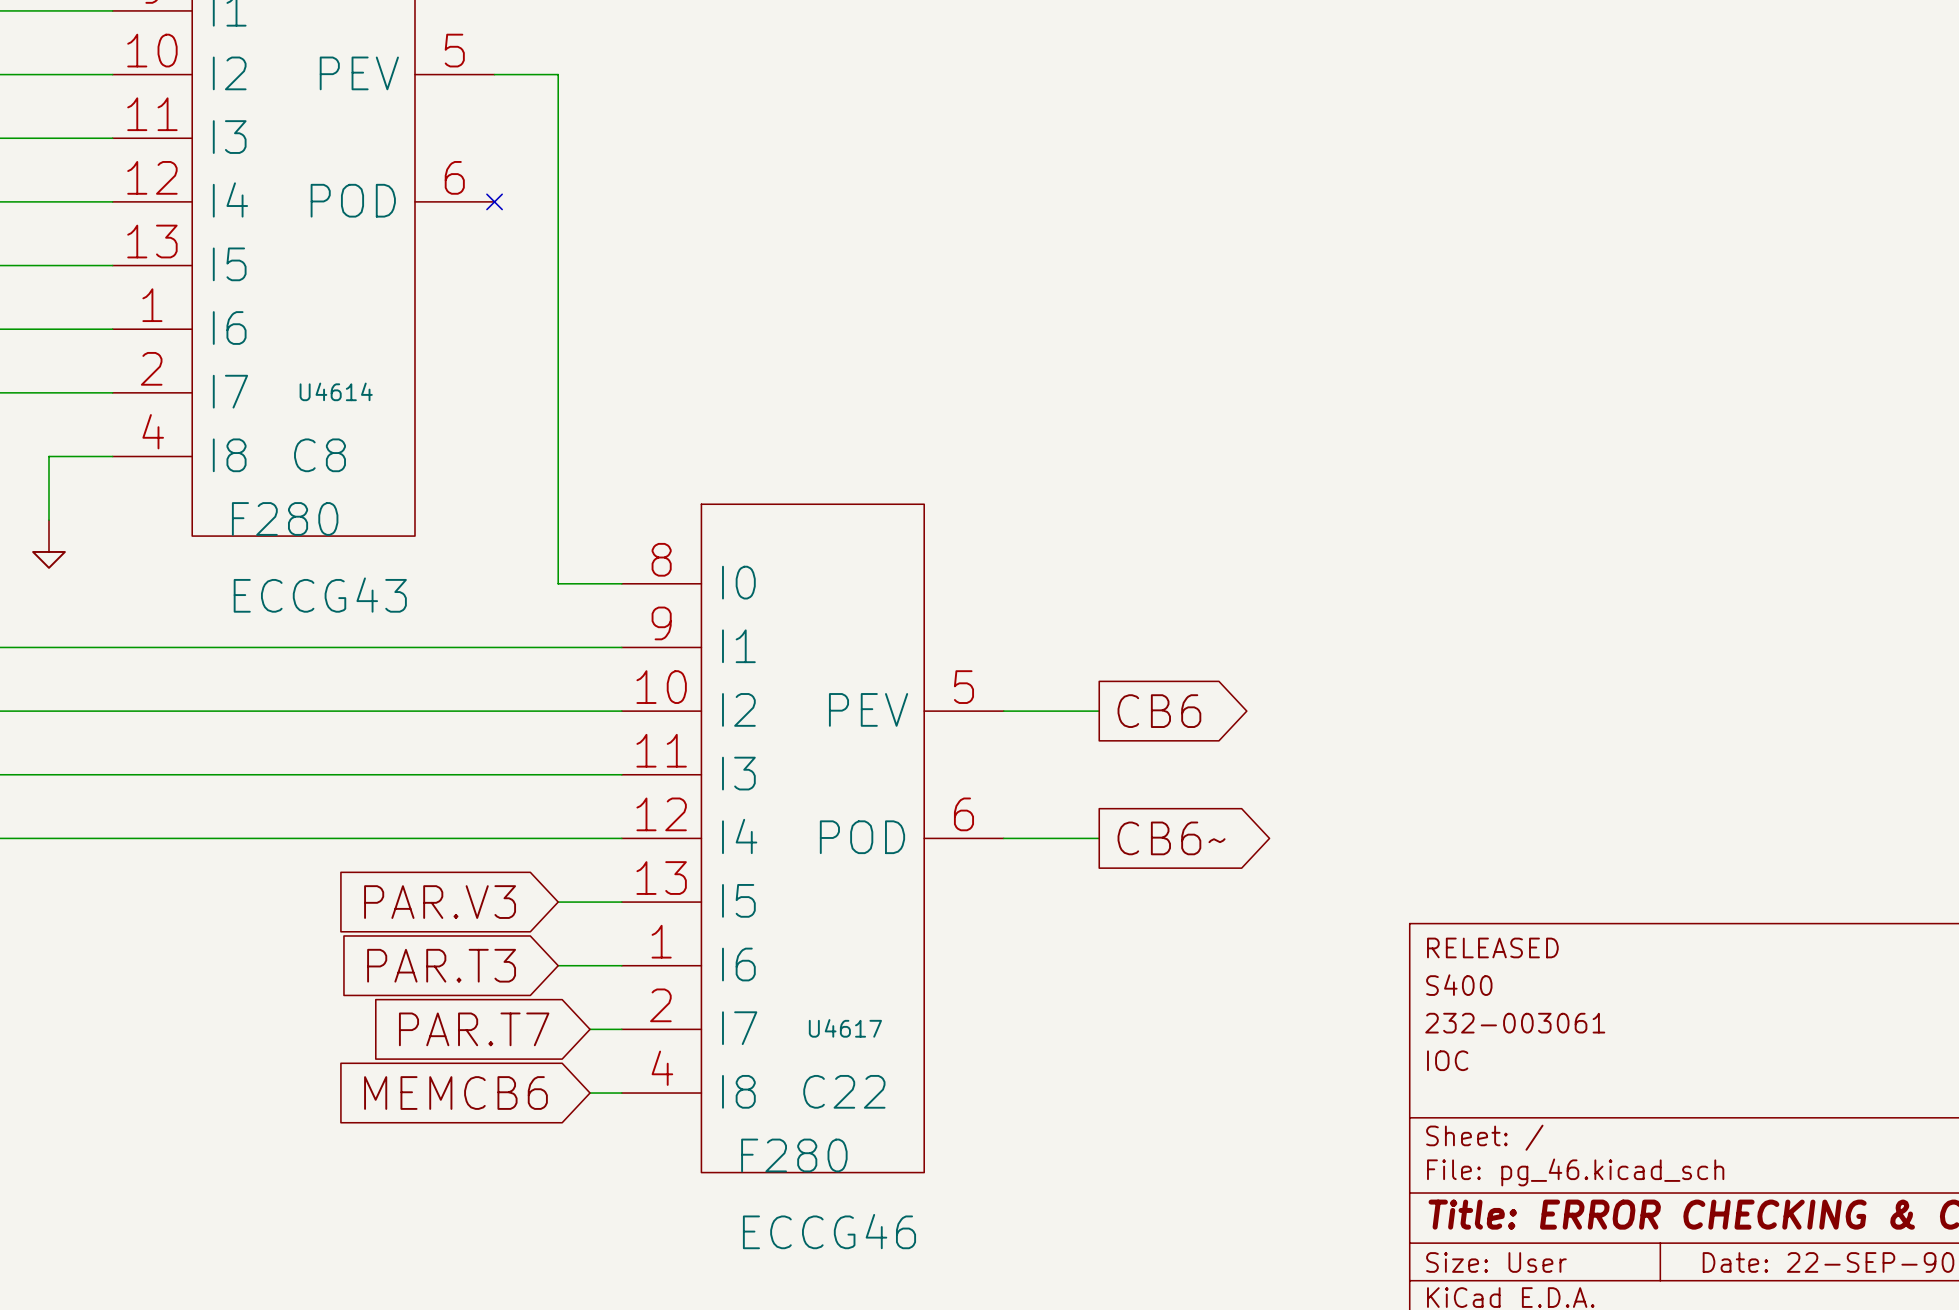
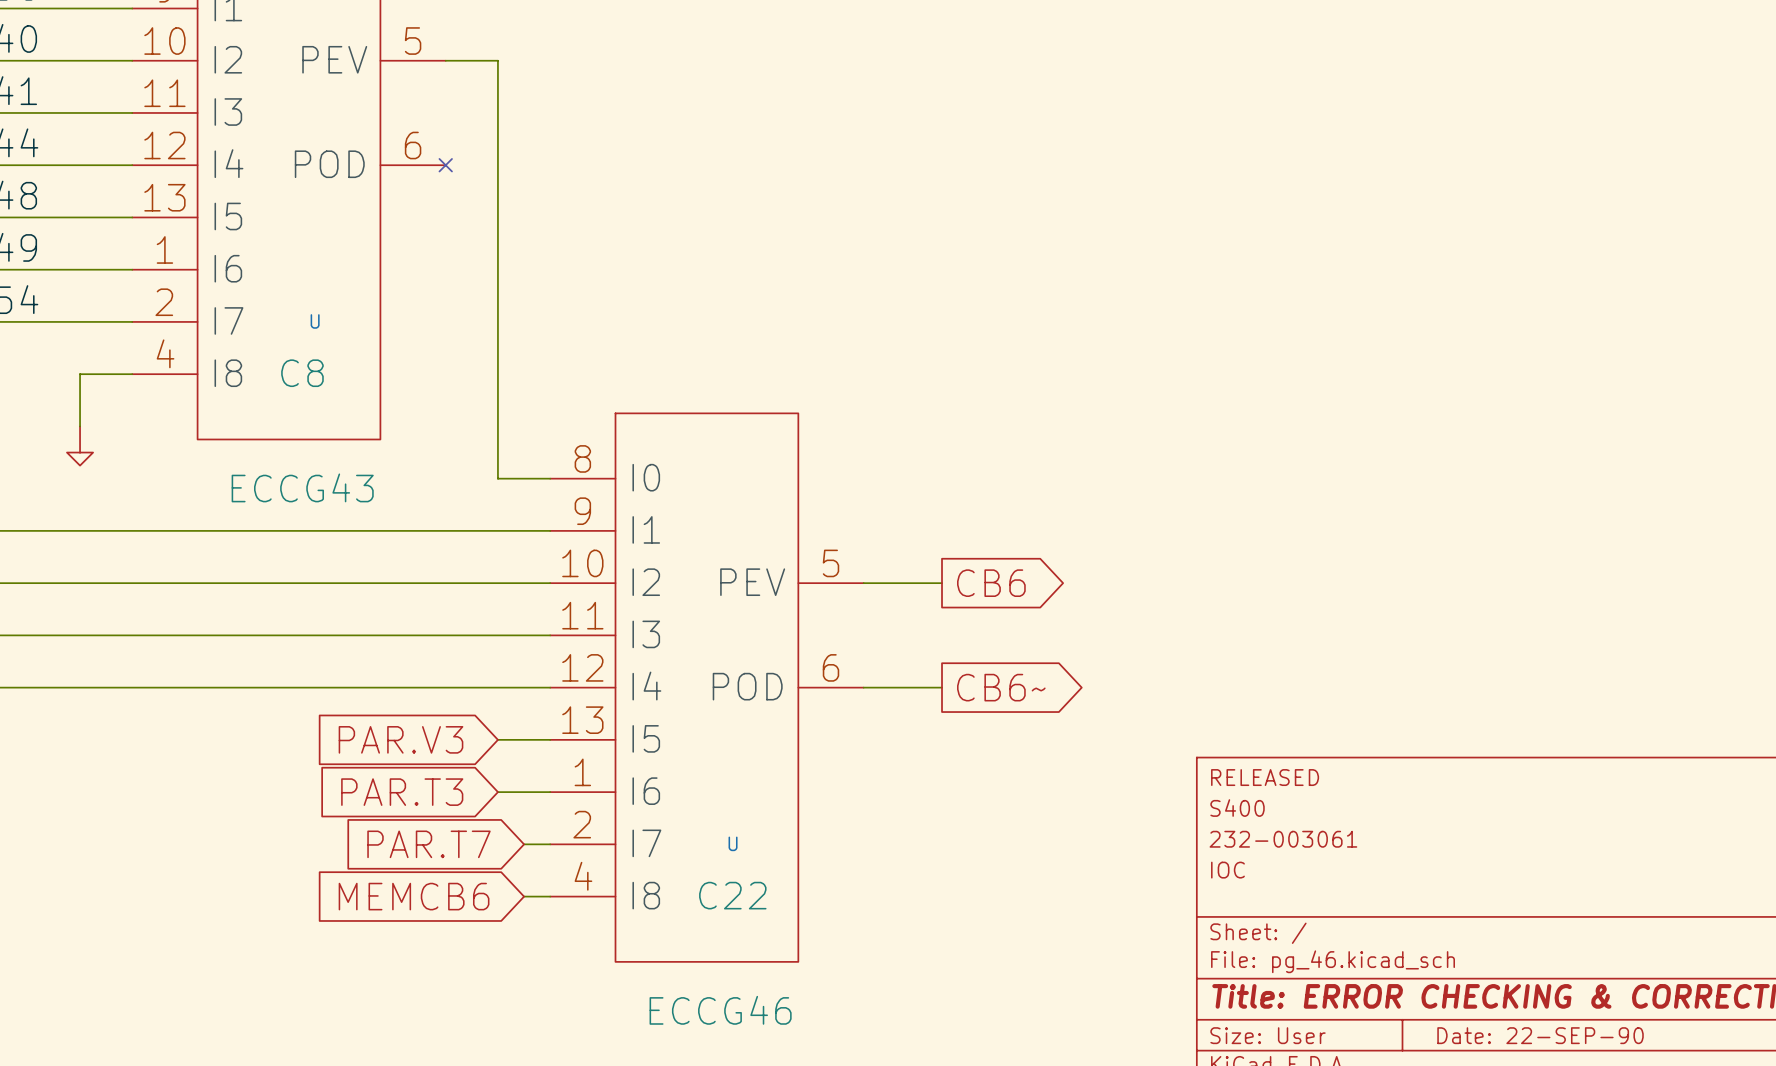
U4614 name: U4614 (336, 391) -> U (315, 321)
U4614 value: F280 (285, 518) -> none
U4617 name: U4617 (845, 1028) -> U (733, 843)
U4617 value: F280 (794, 1155) -> none

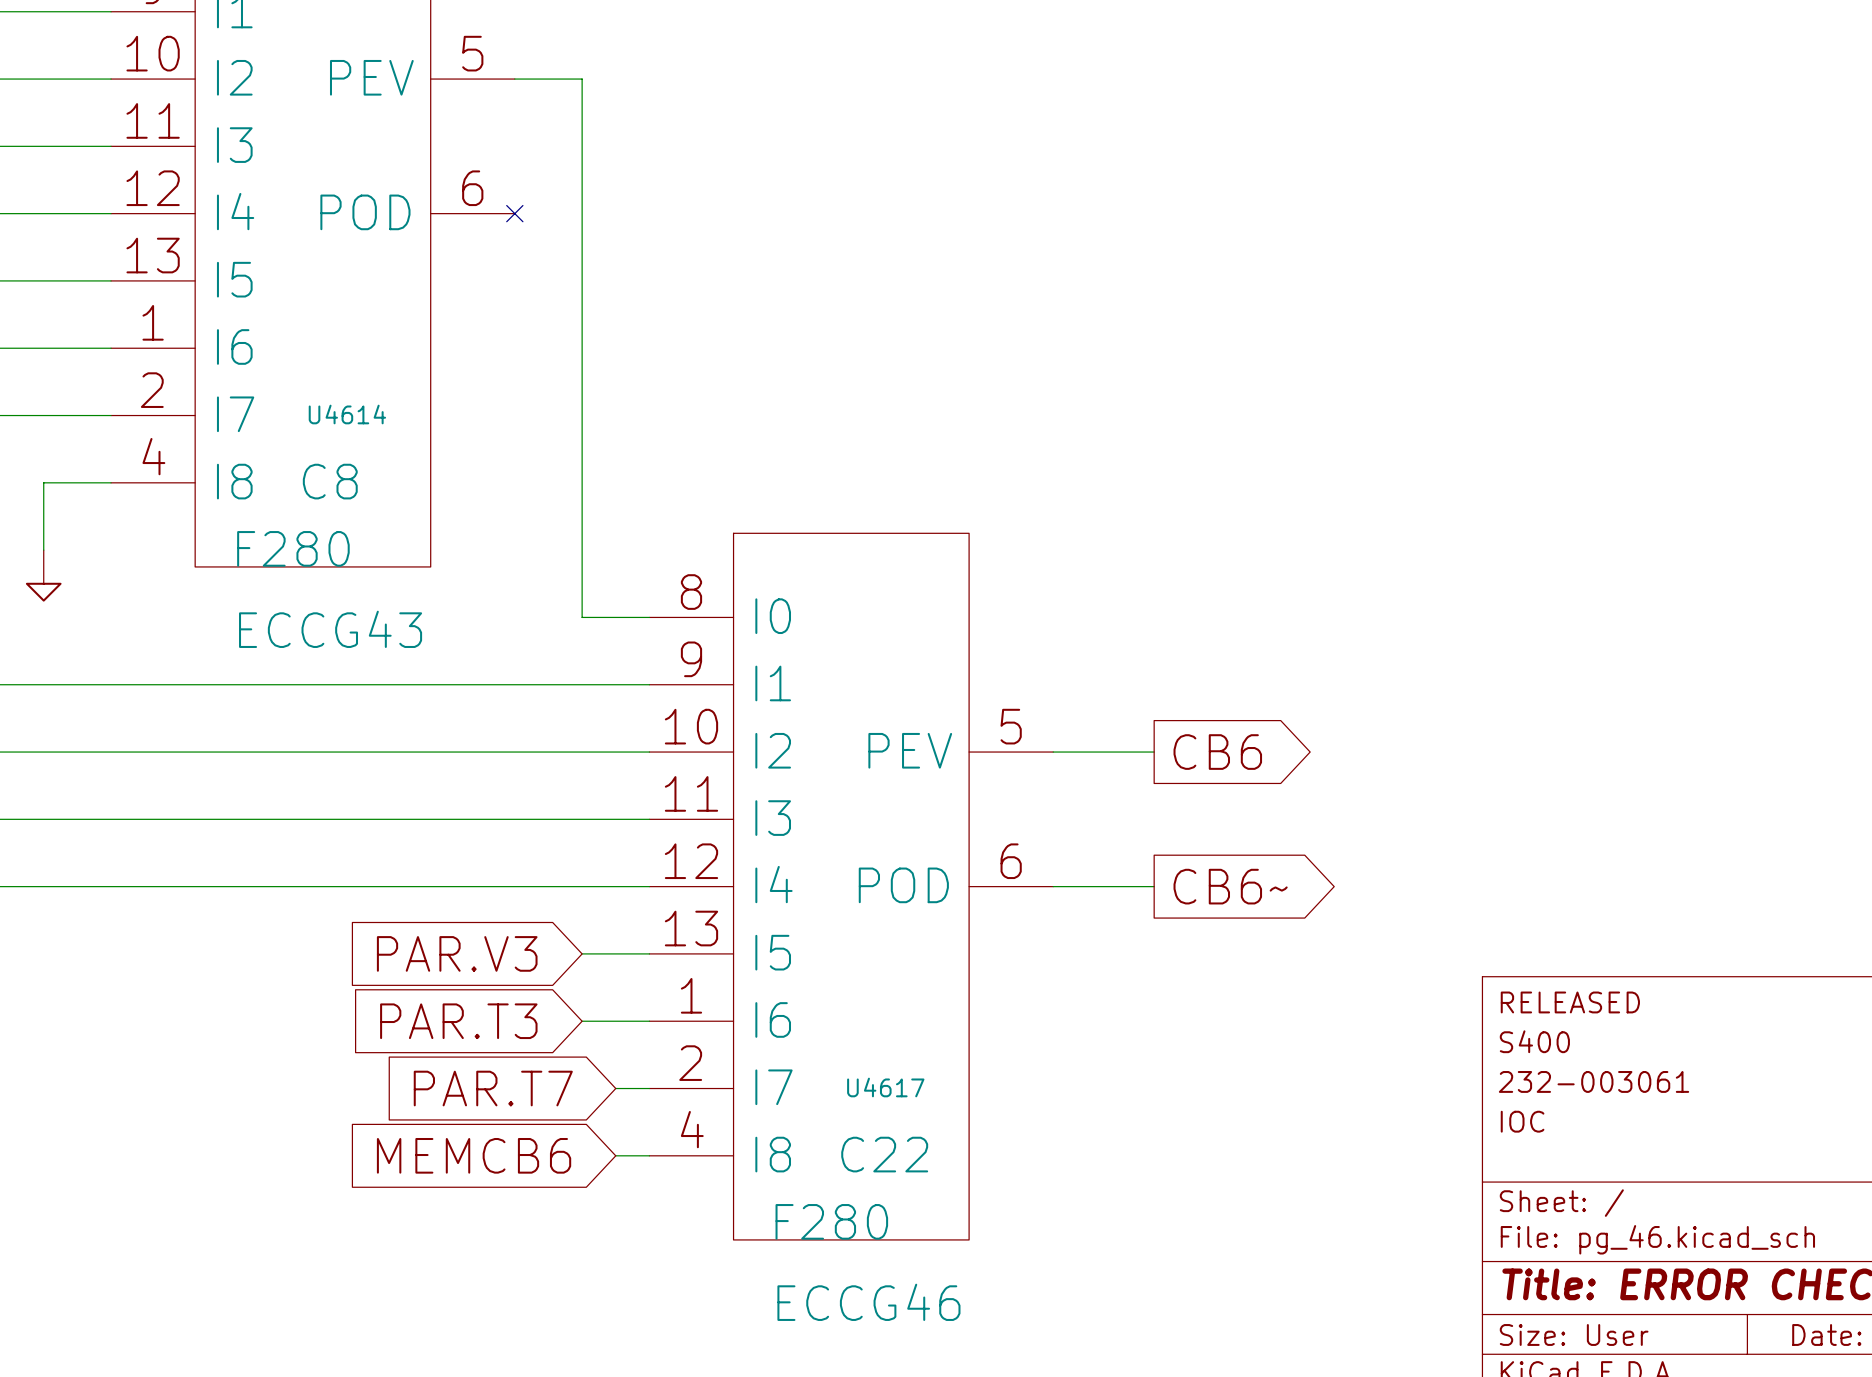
U name: U (315, 321) -> U4614 (347, 414)
U value: none -> F280 (293, 548)
U name: U (733, 843) -> U4617 (885, 1087)
U value: none -> F280 (831, 1221)

